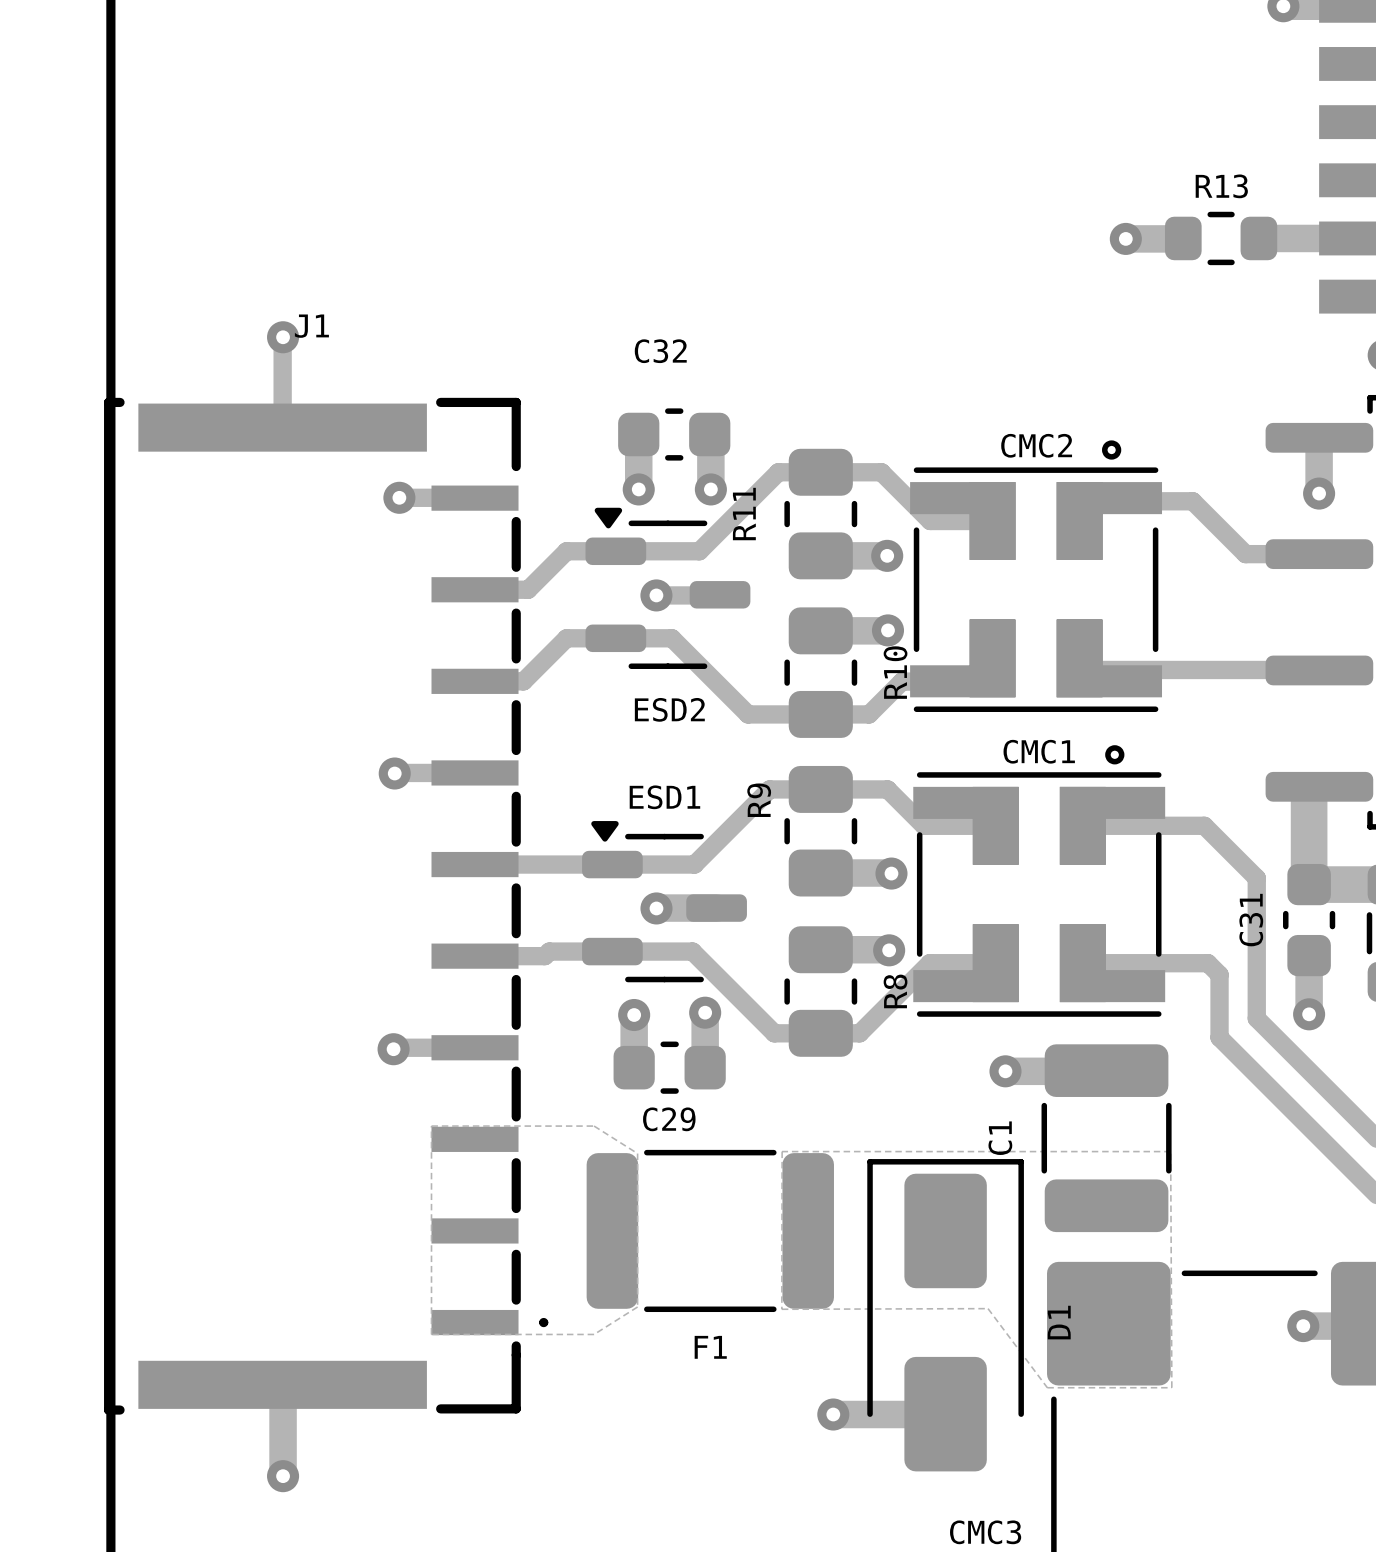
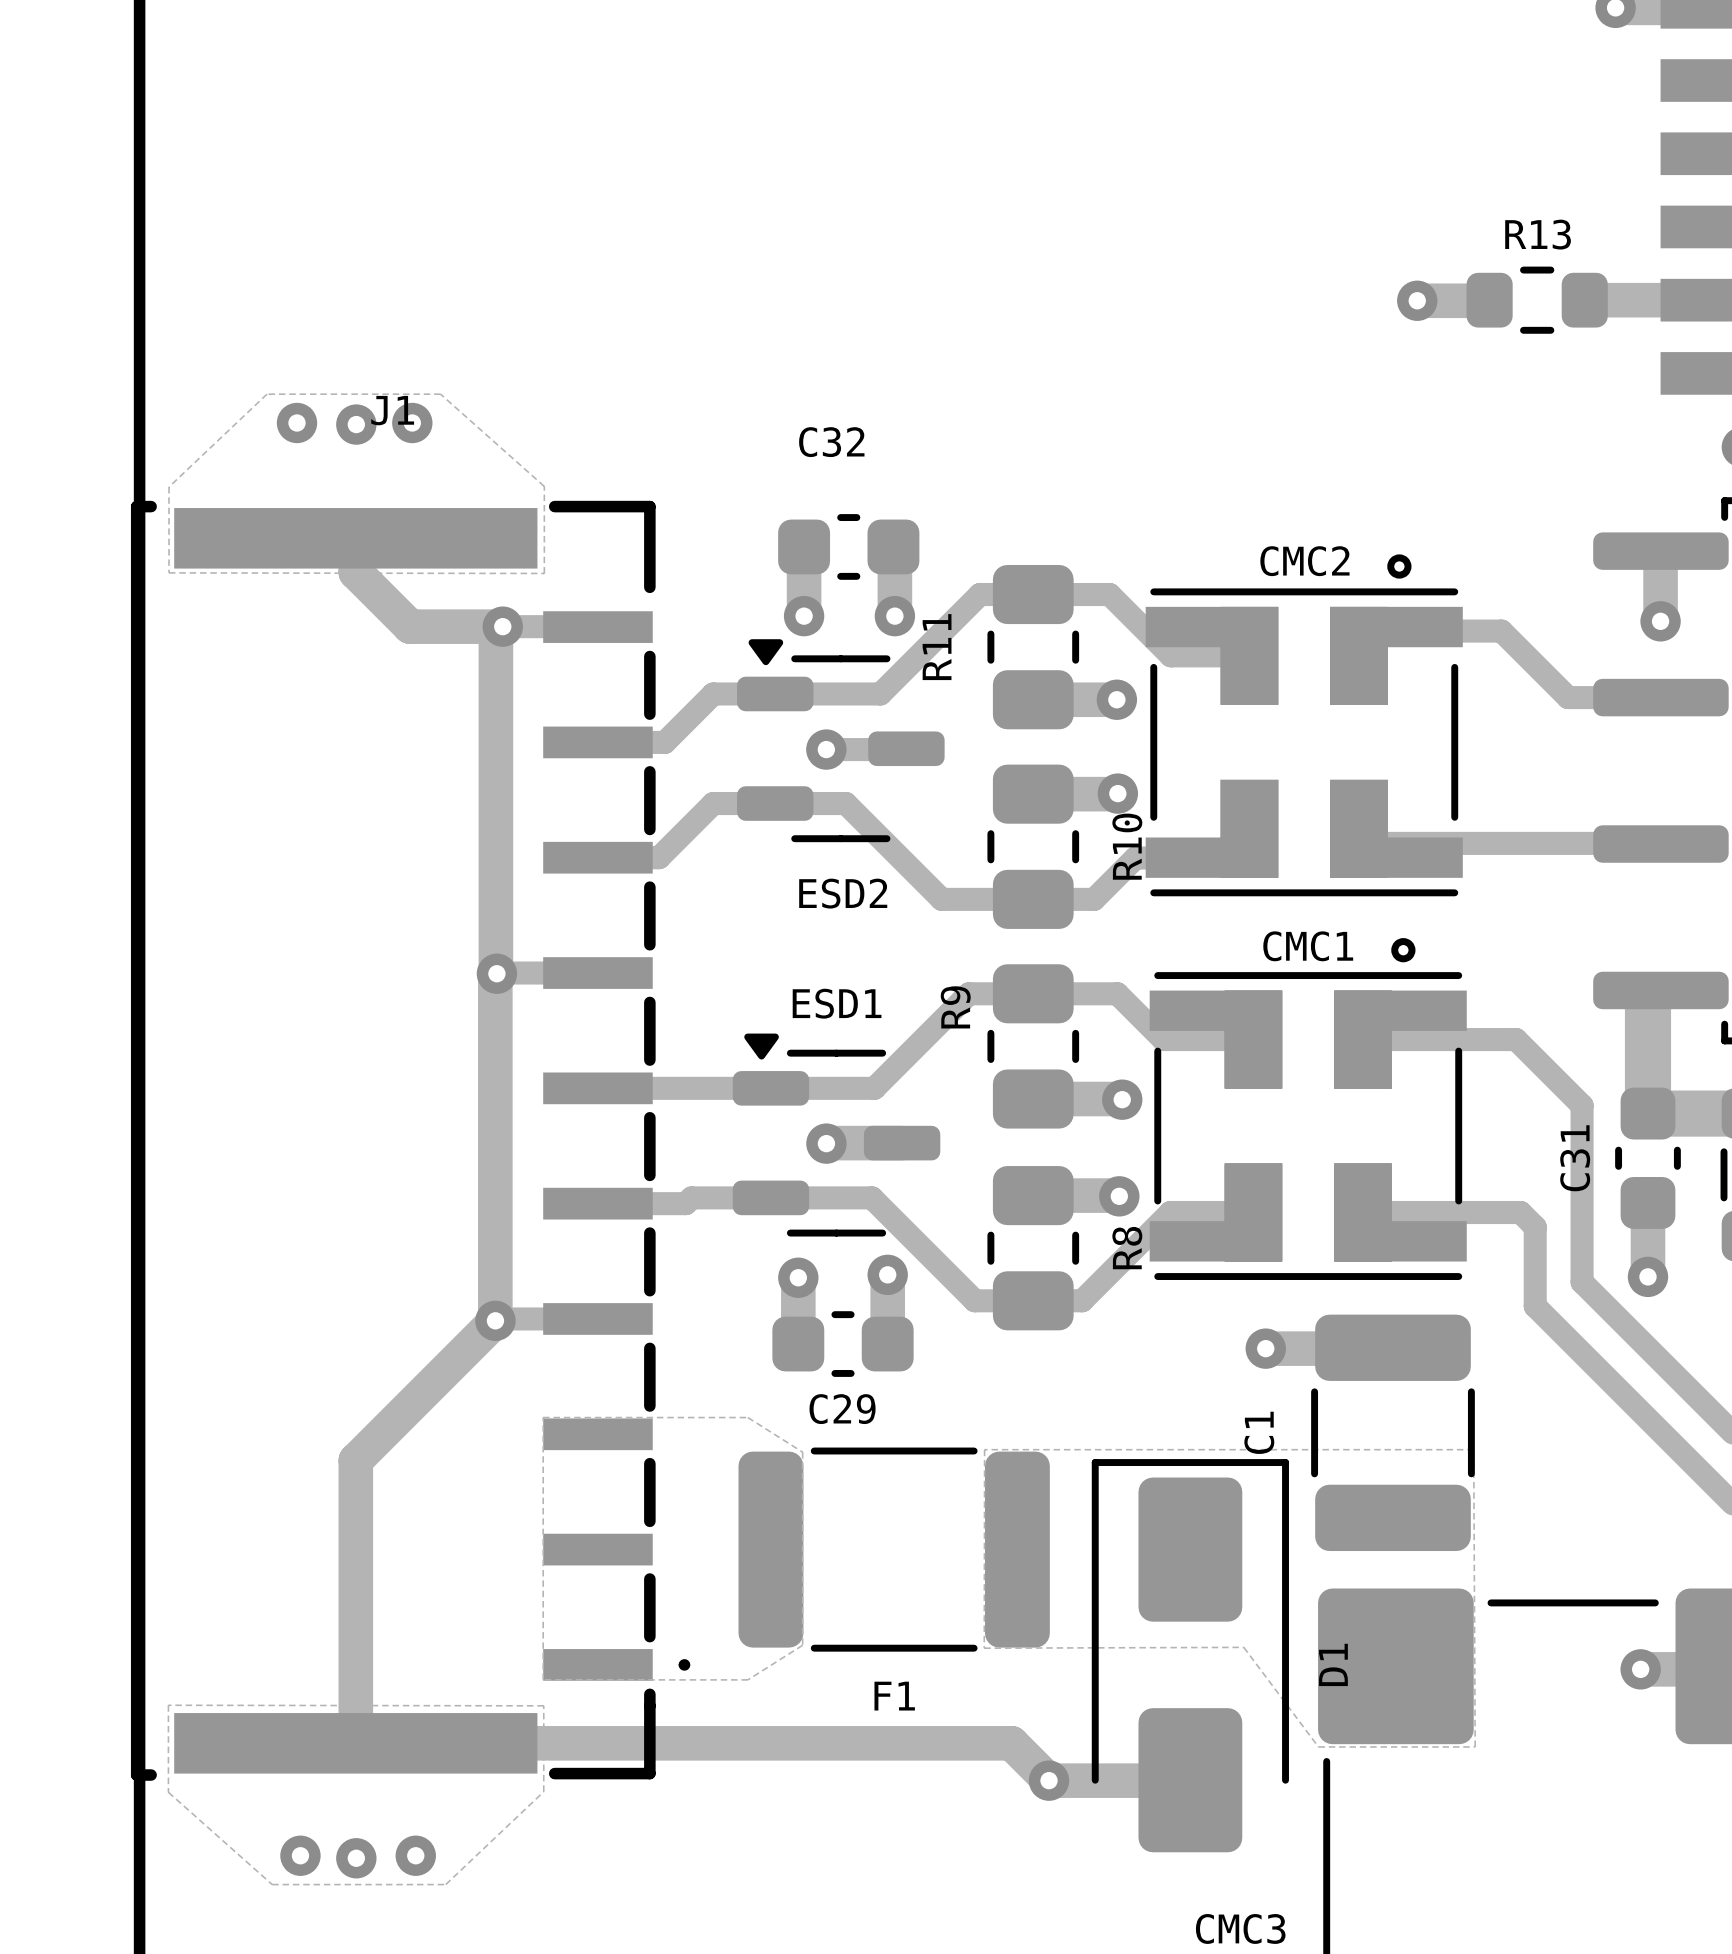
zone outline: none -> (267, 394) (440, 394) (544, 486) (544, 573) (169, 572) (169, 486) (267, 394)
via: none -> (297, 422)
via: none -> (412, 422)
track: (282, 337) (282, 427) -> (1049, 1780) (1011, 1743) (355, 1743) (355, 1460) (495, 1320) (495, 633) (502, 626) (410, 626) (355, 572) (355, 538)
zone outline: none -> (168, 1705) (543, 1705) (543, 1791) (445, 1884) (272, 1884) (168, 1792) (168, 1705)
track: (283, 1385) (283, 1476) -> none
via: none -> (300, 1855)
via: none -> (415, 1855)

